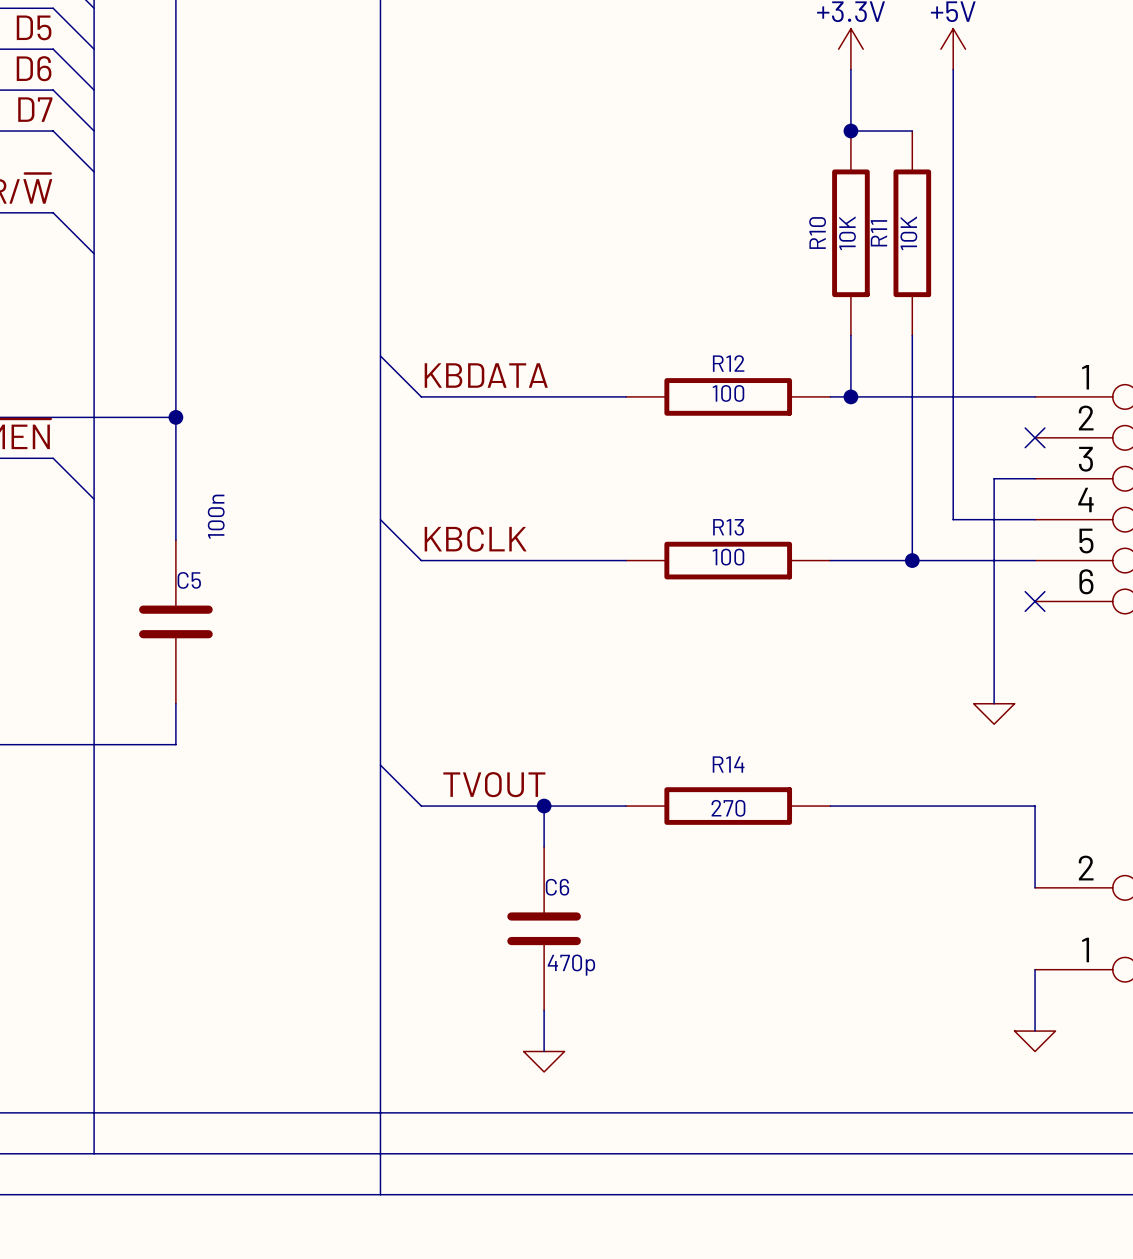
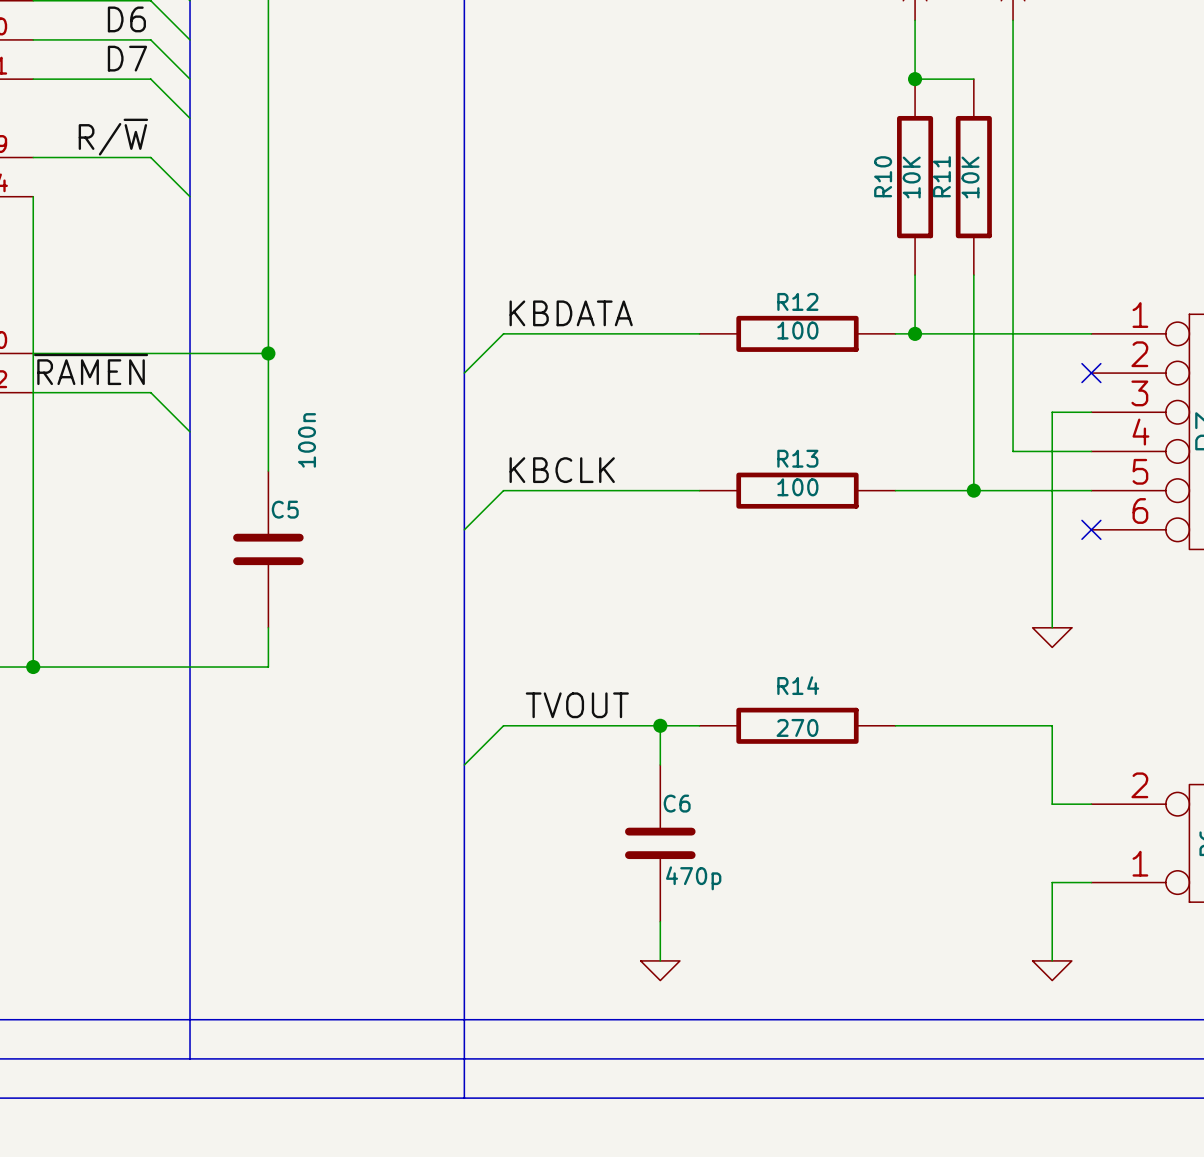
wire: (380, 356) (421, 396) -> (464, 373) (503, 333)
wire: (380, 519) (421, 560) -> (464, 529) (503, 490)
wire: (380, 765) (421, 806) -> (464, 764) (503, 725)
wire: (544, 806) (544, 846) -> (660, 725) (660, 764)
junction position: (544, 806) -> (660, 725)
wire: (994, 806) (1035, 806) (1035, 887) -> (1052, 725) (1052, 804) (1091, 804)
C6 position: (544, 928) -> (660, 843)
wire: (1035, 969) (1035, 1031) -> (1091, 882) (1052, 882) (1052, 960)
wire: (544, 1010) (544, 1051) -> (660, 921) (660, 960)
power symbol position: (1035, 1041) -> (1052, 970)
power symbol position: (544, 1061) -> (660, 970)

